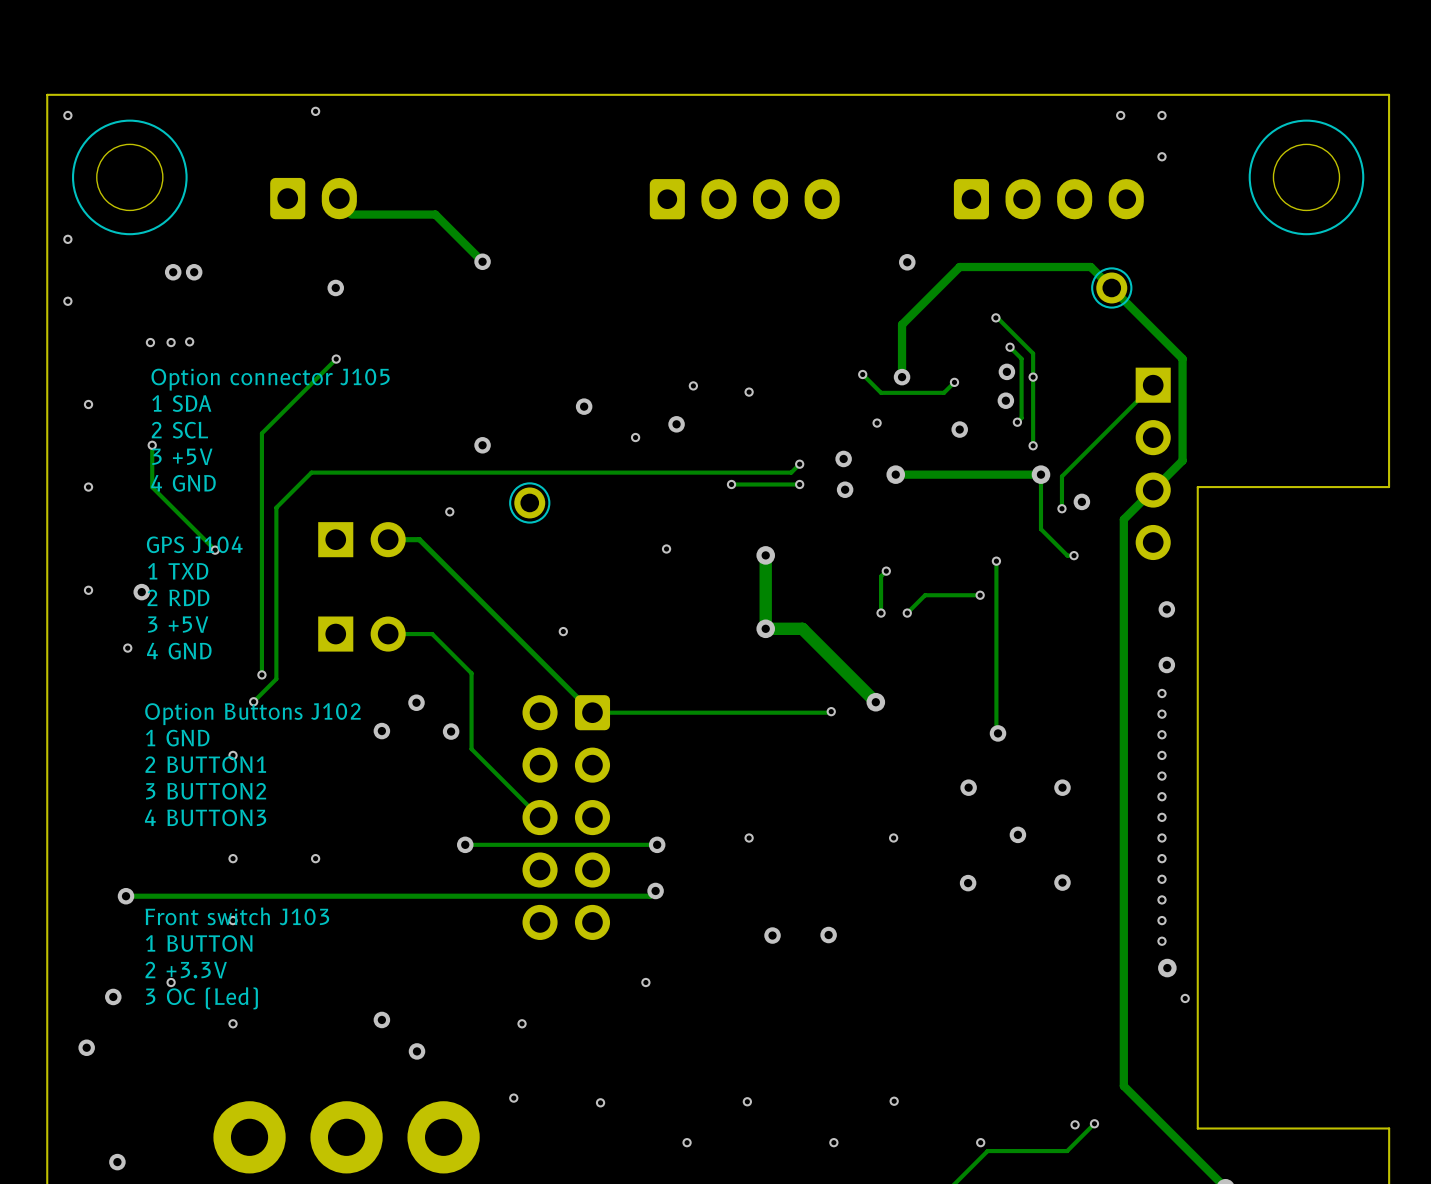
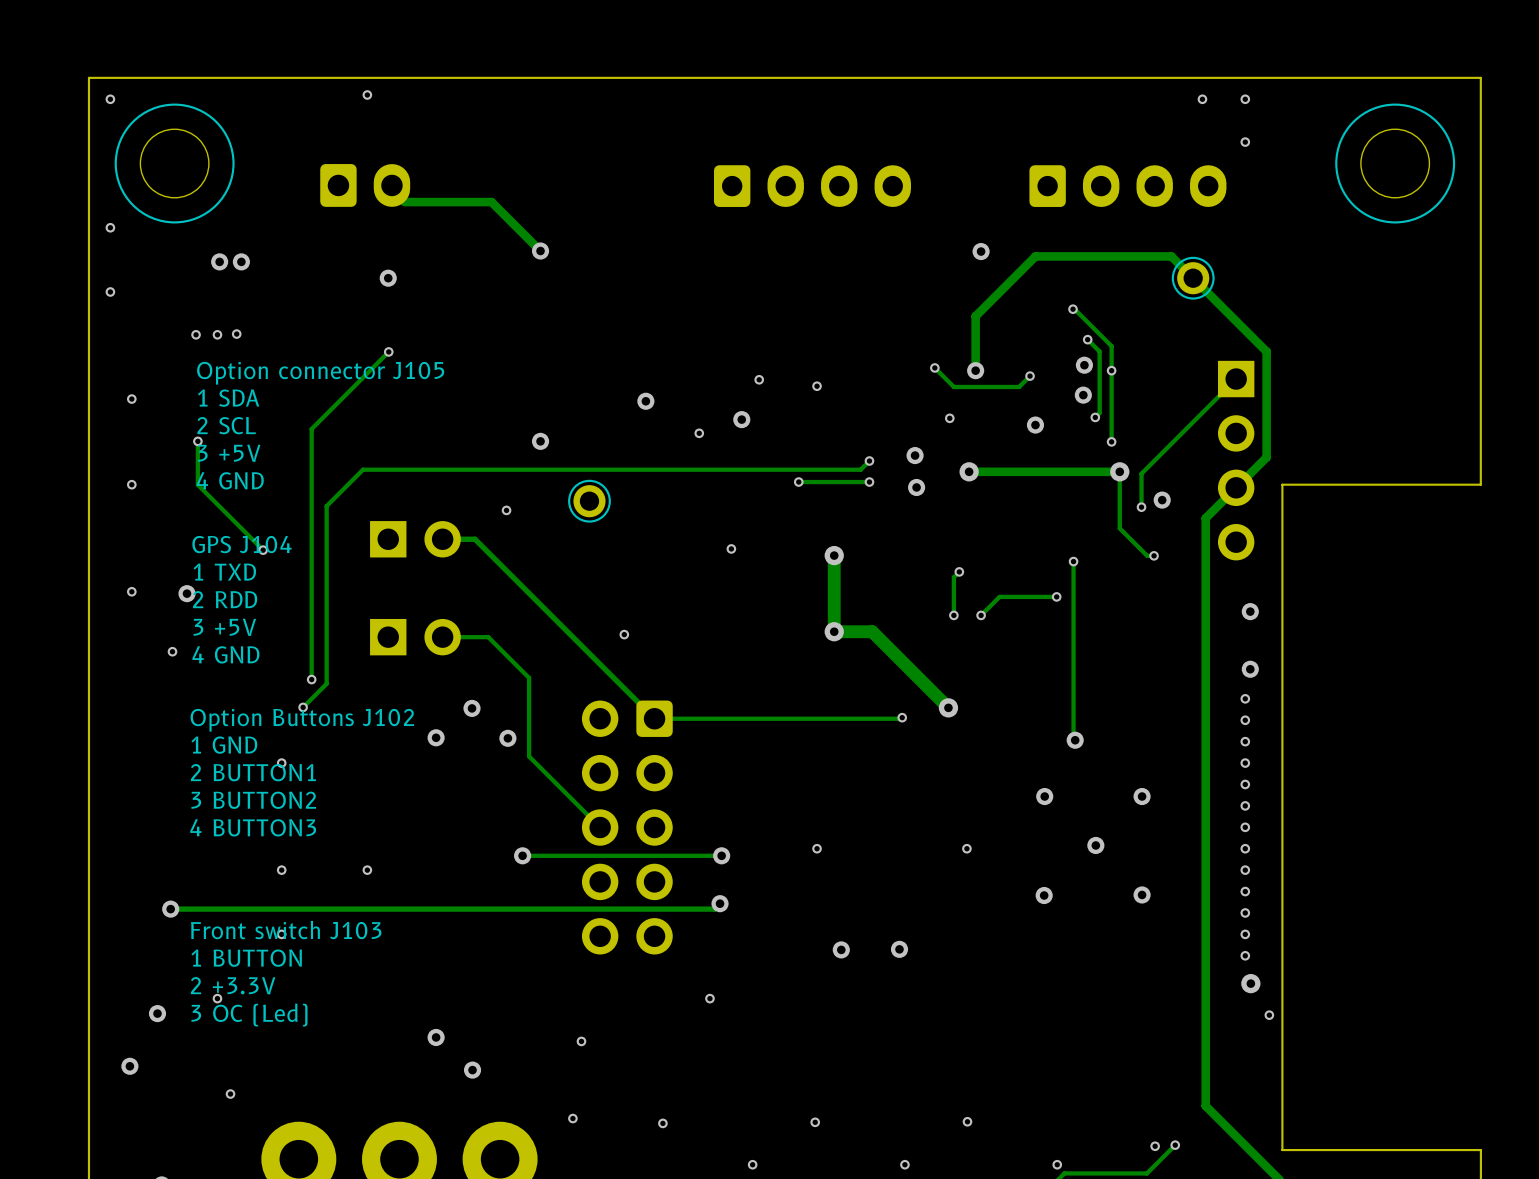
via position: (233, 1023) -> (230, 1094)

